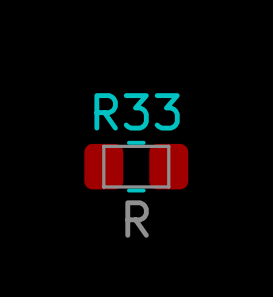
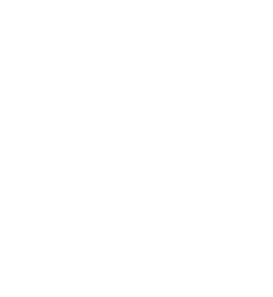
R33: R (136, 166) -> none

